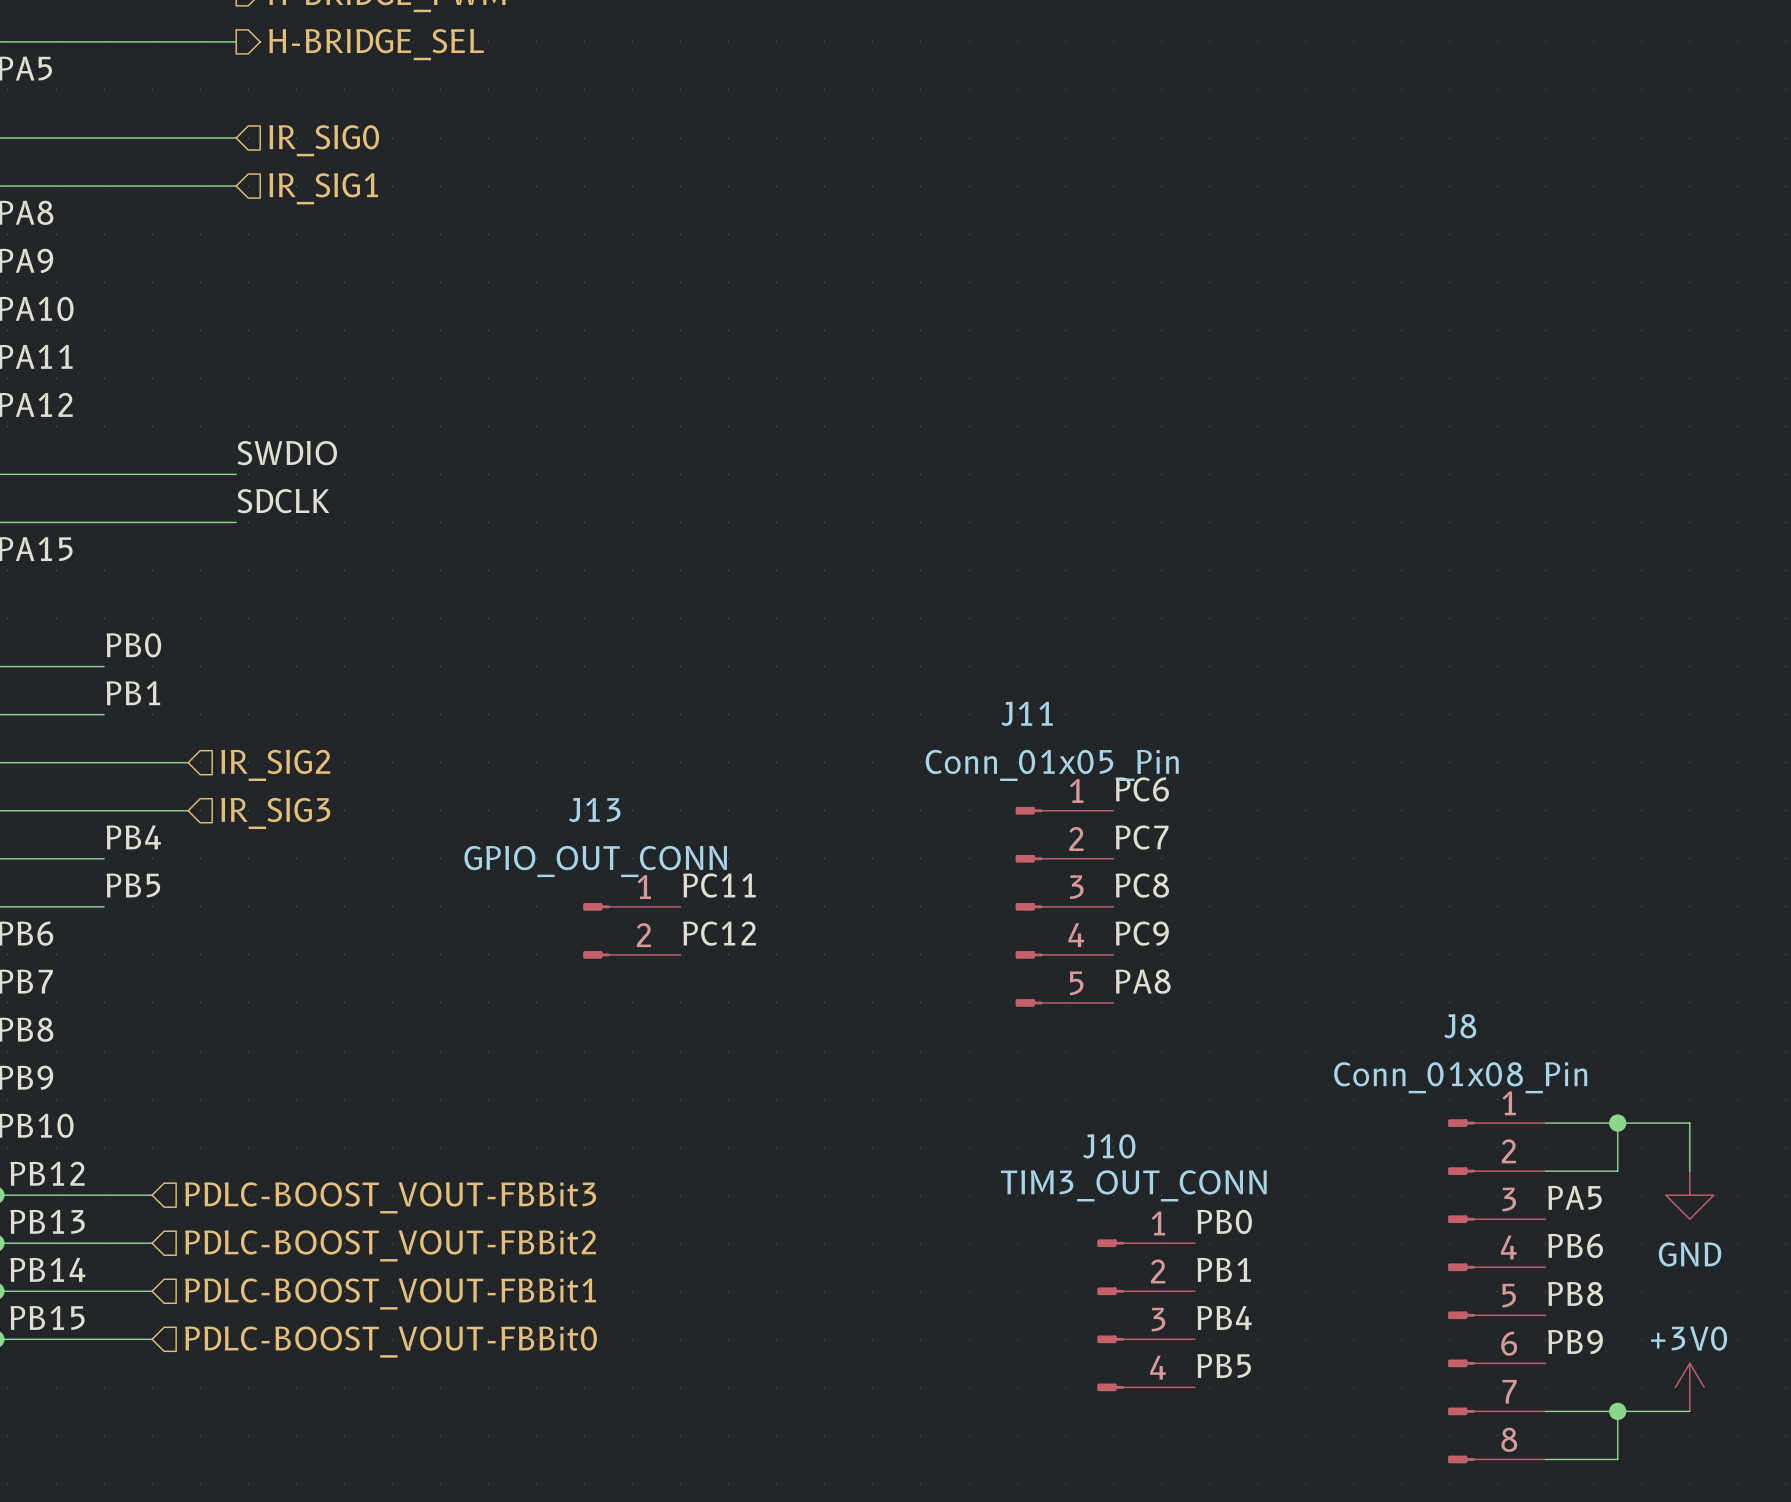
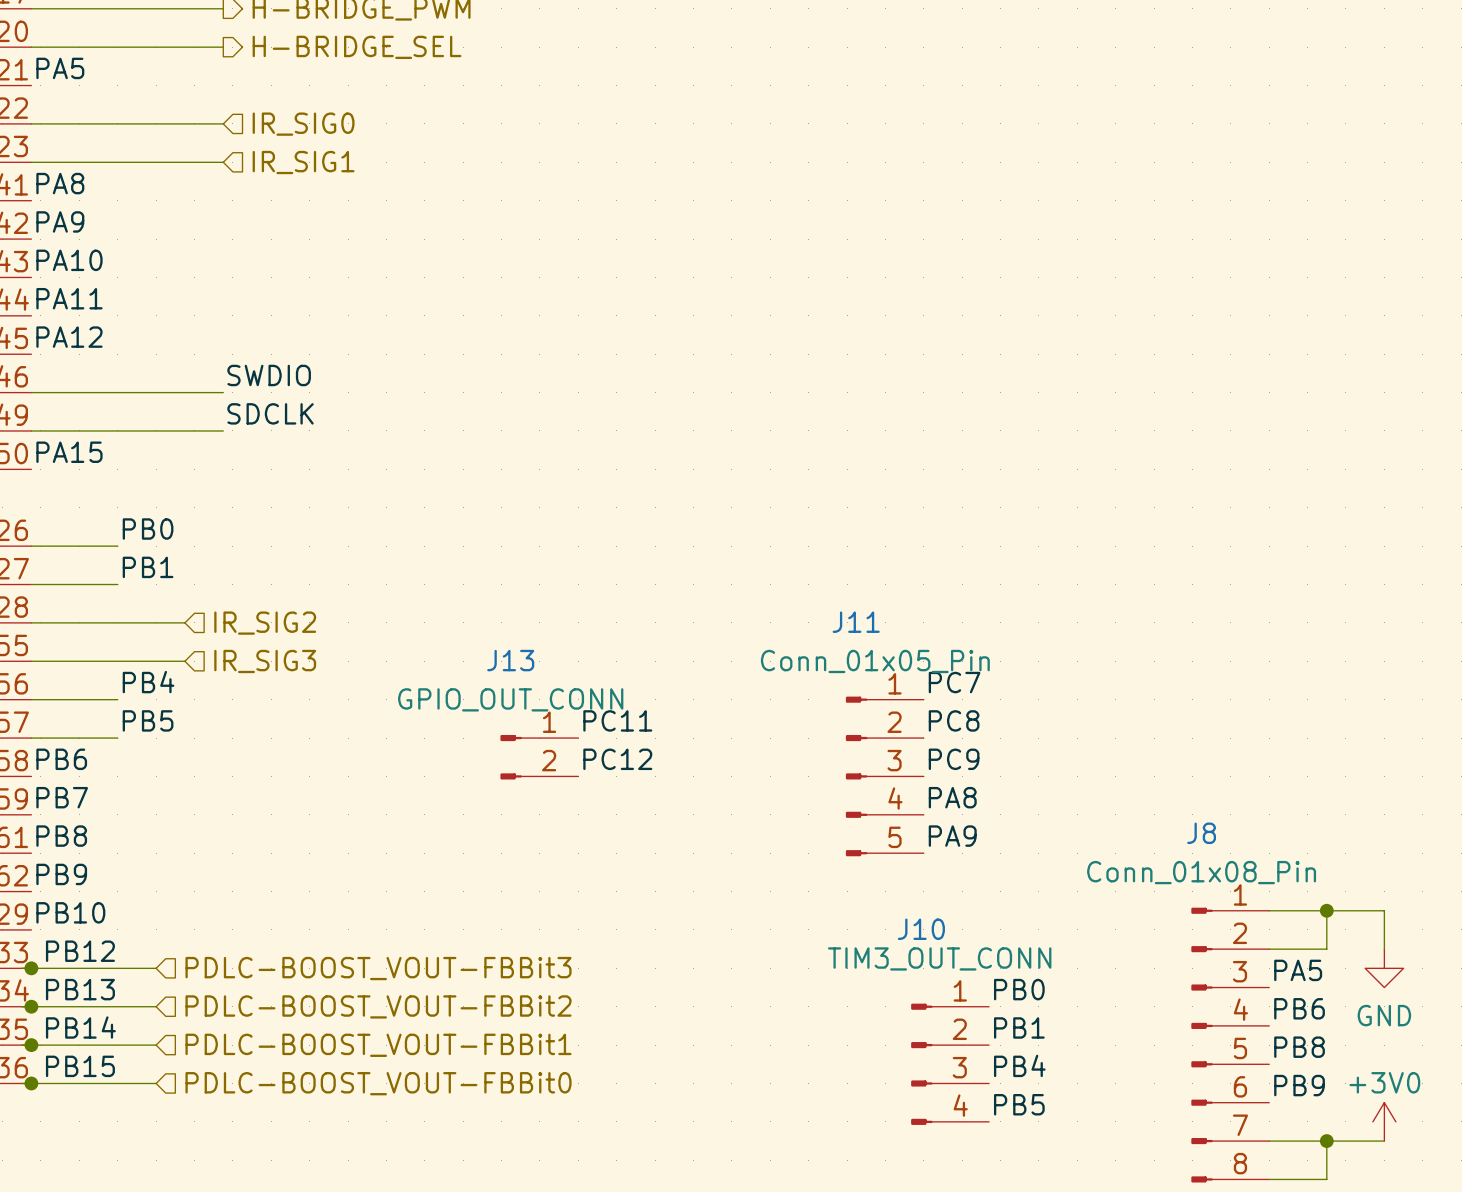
label: PC6 (1142, 789) -> none
J11 position: (1064, 906) -> (884, 776)
label: none -> PA9 (952, 836)

